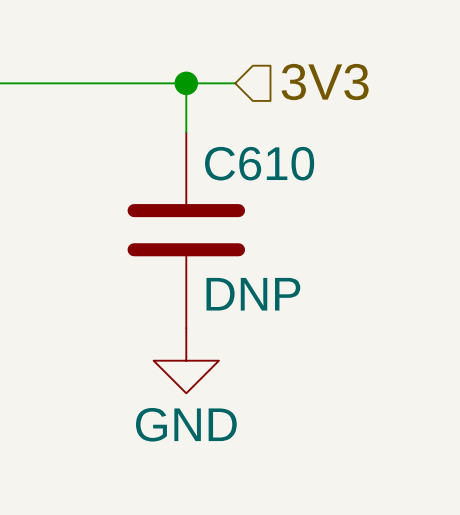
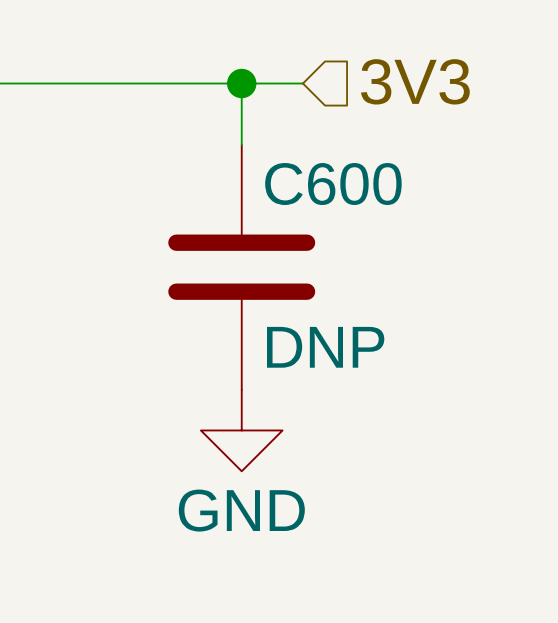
C610 name: C610 (259, 163) -> C600 (333, 184)

